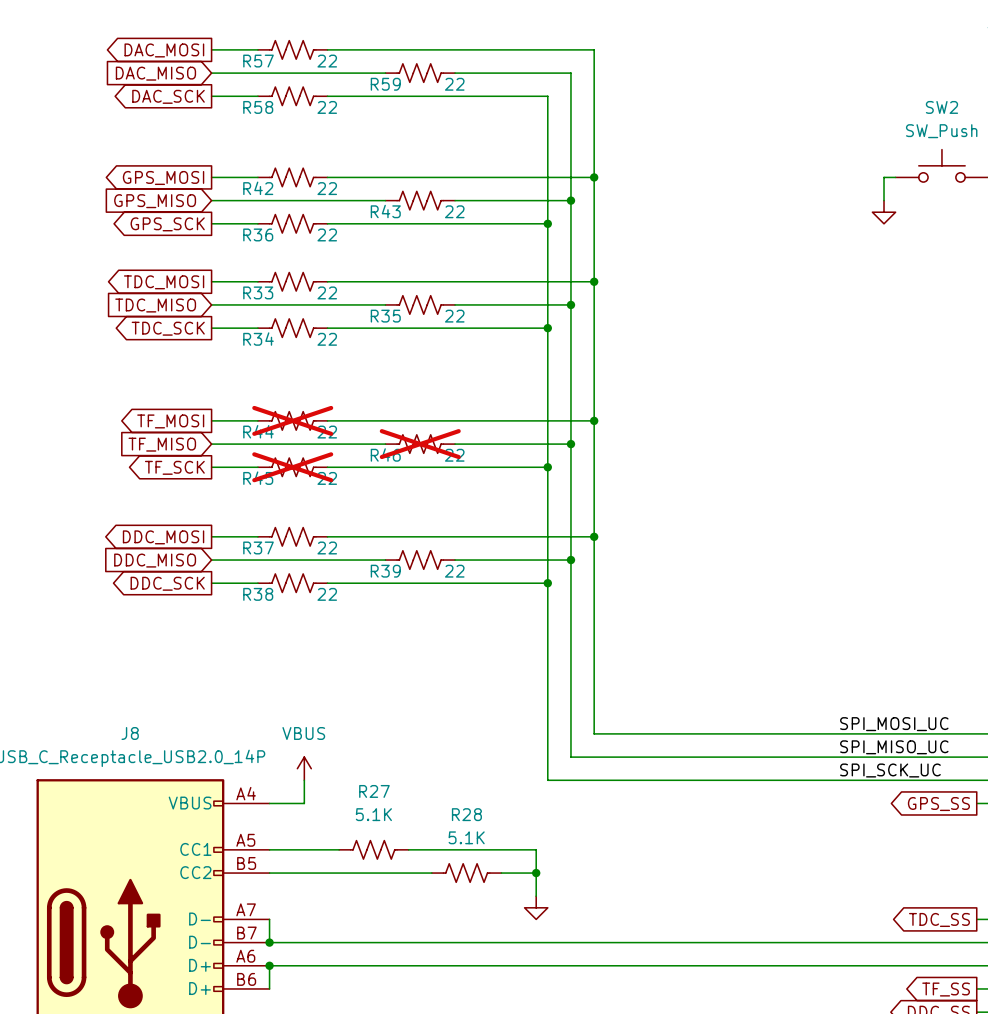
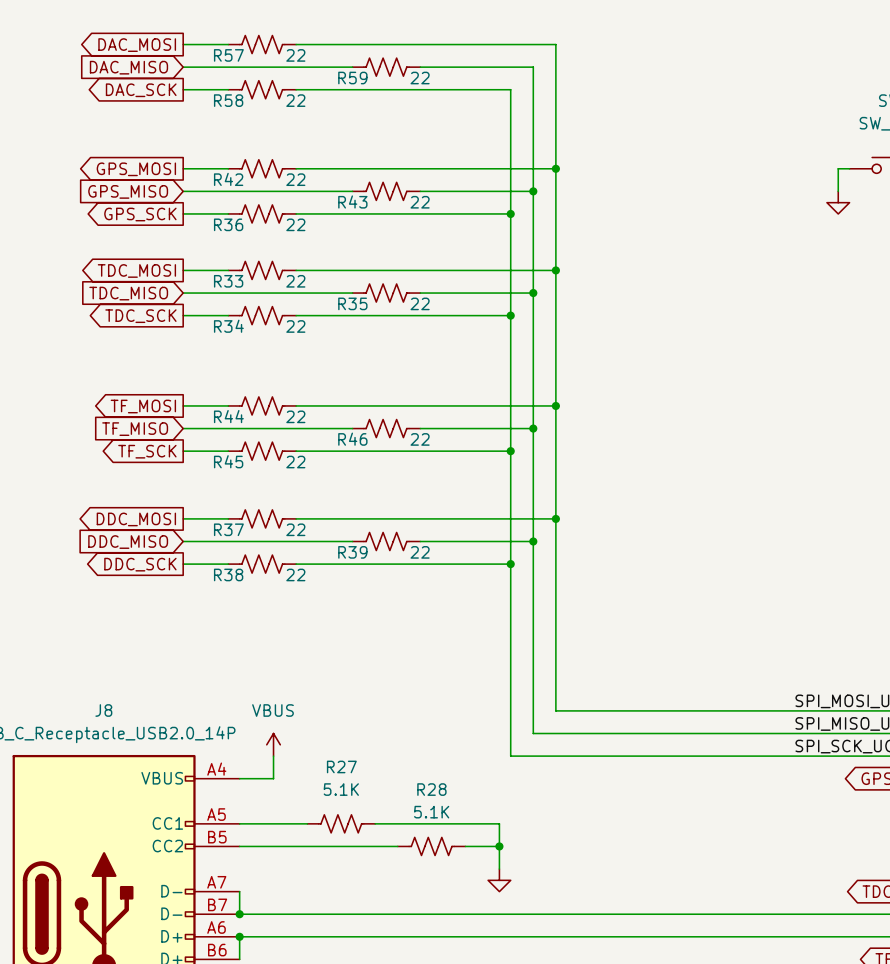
R44 do-not-place cross: (292, 420) -> none
R46 do-not-place cross: (420, 444) -> none
R45 do-not-place cross: (292, 467) -> none

